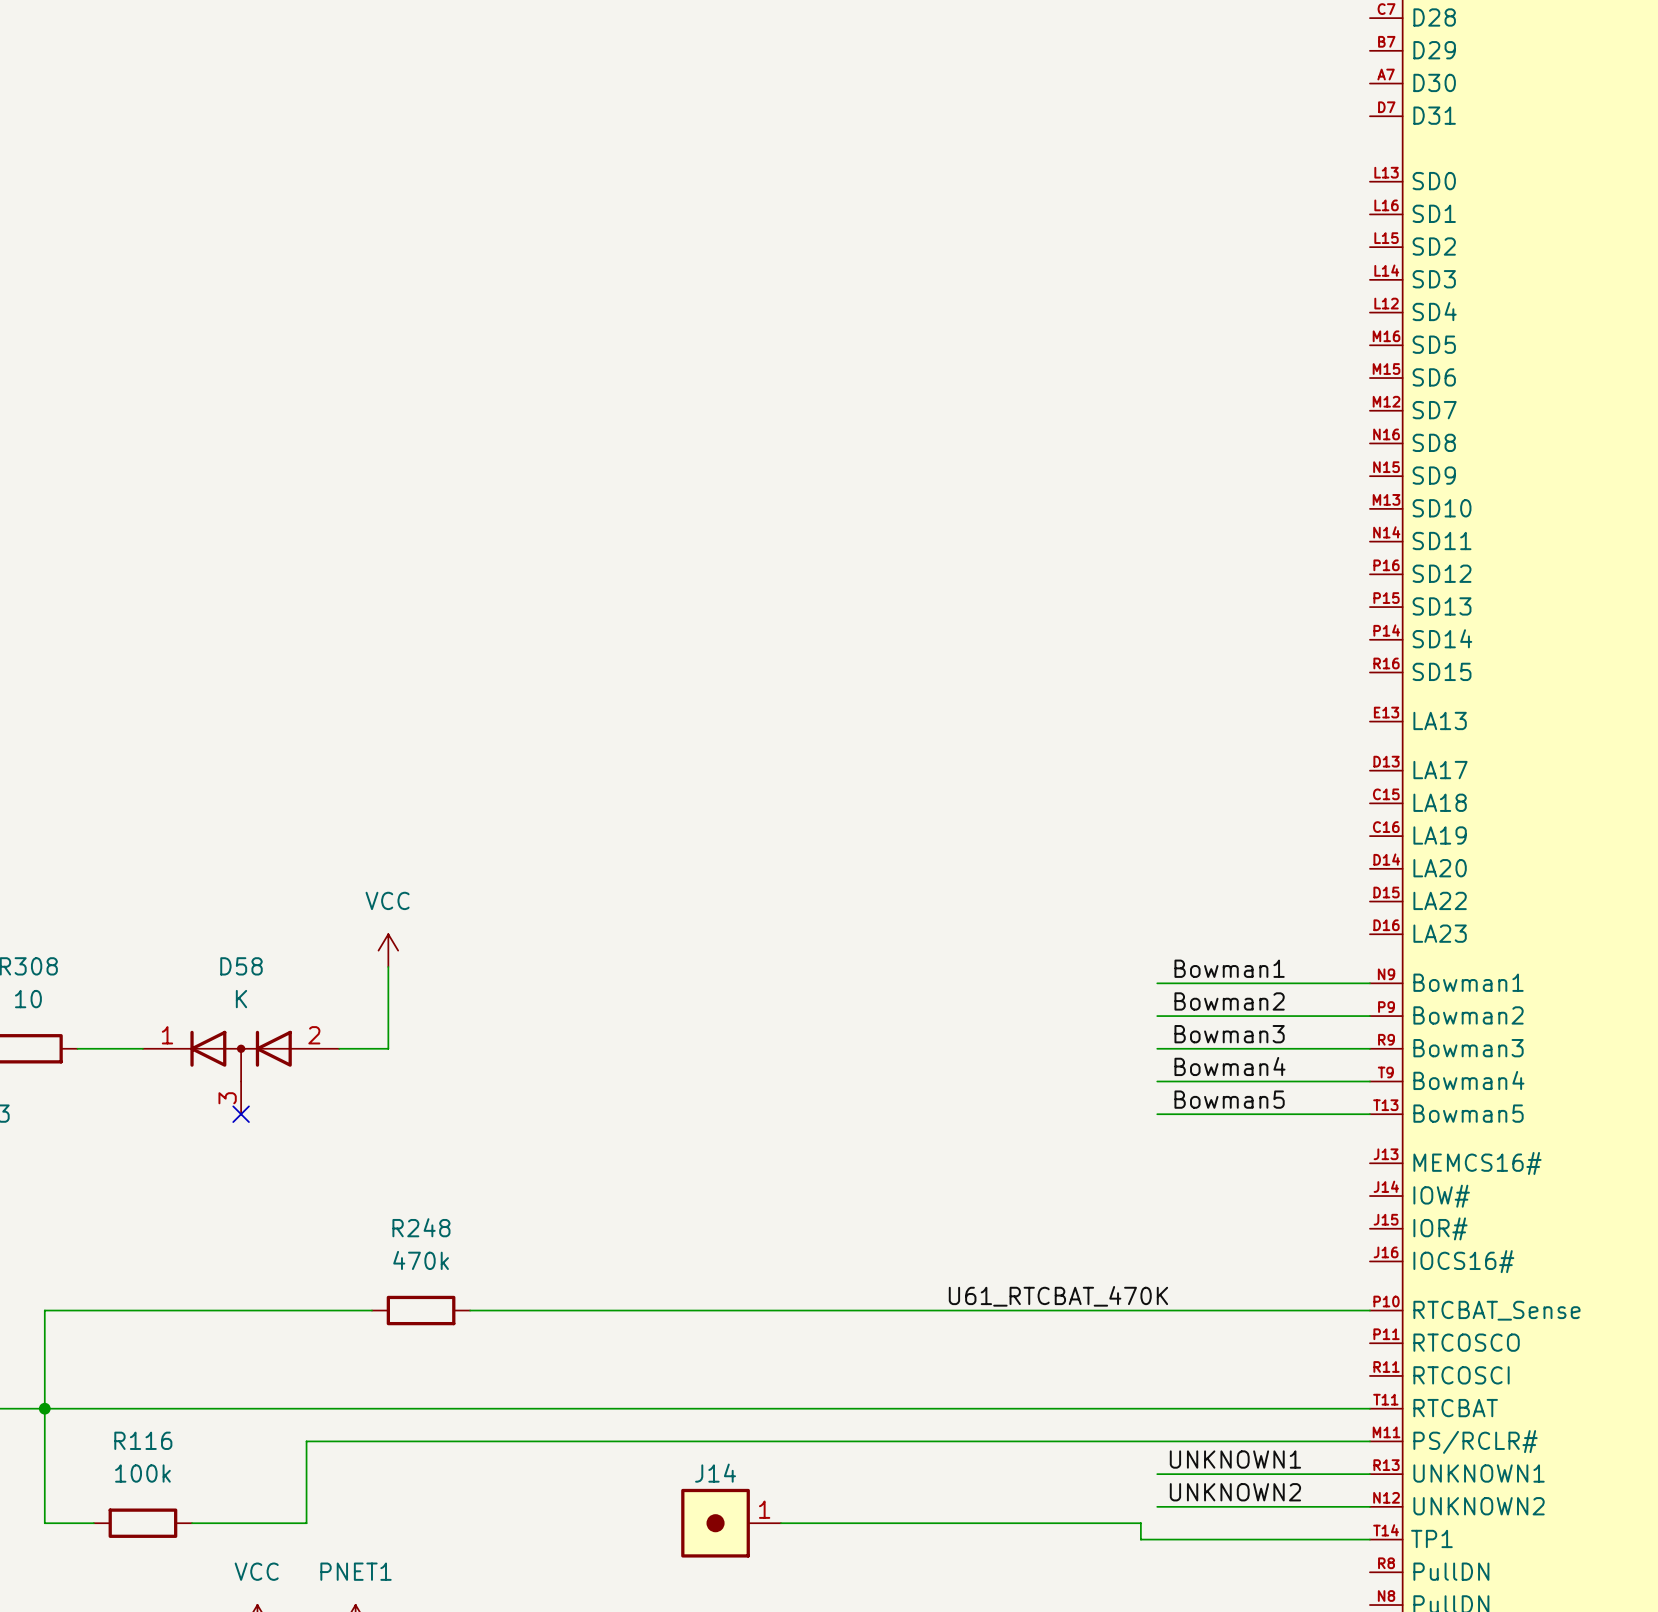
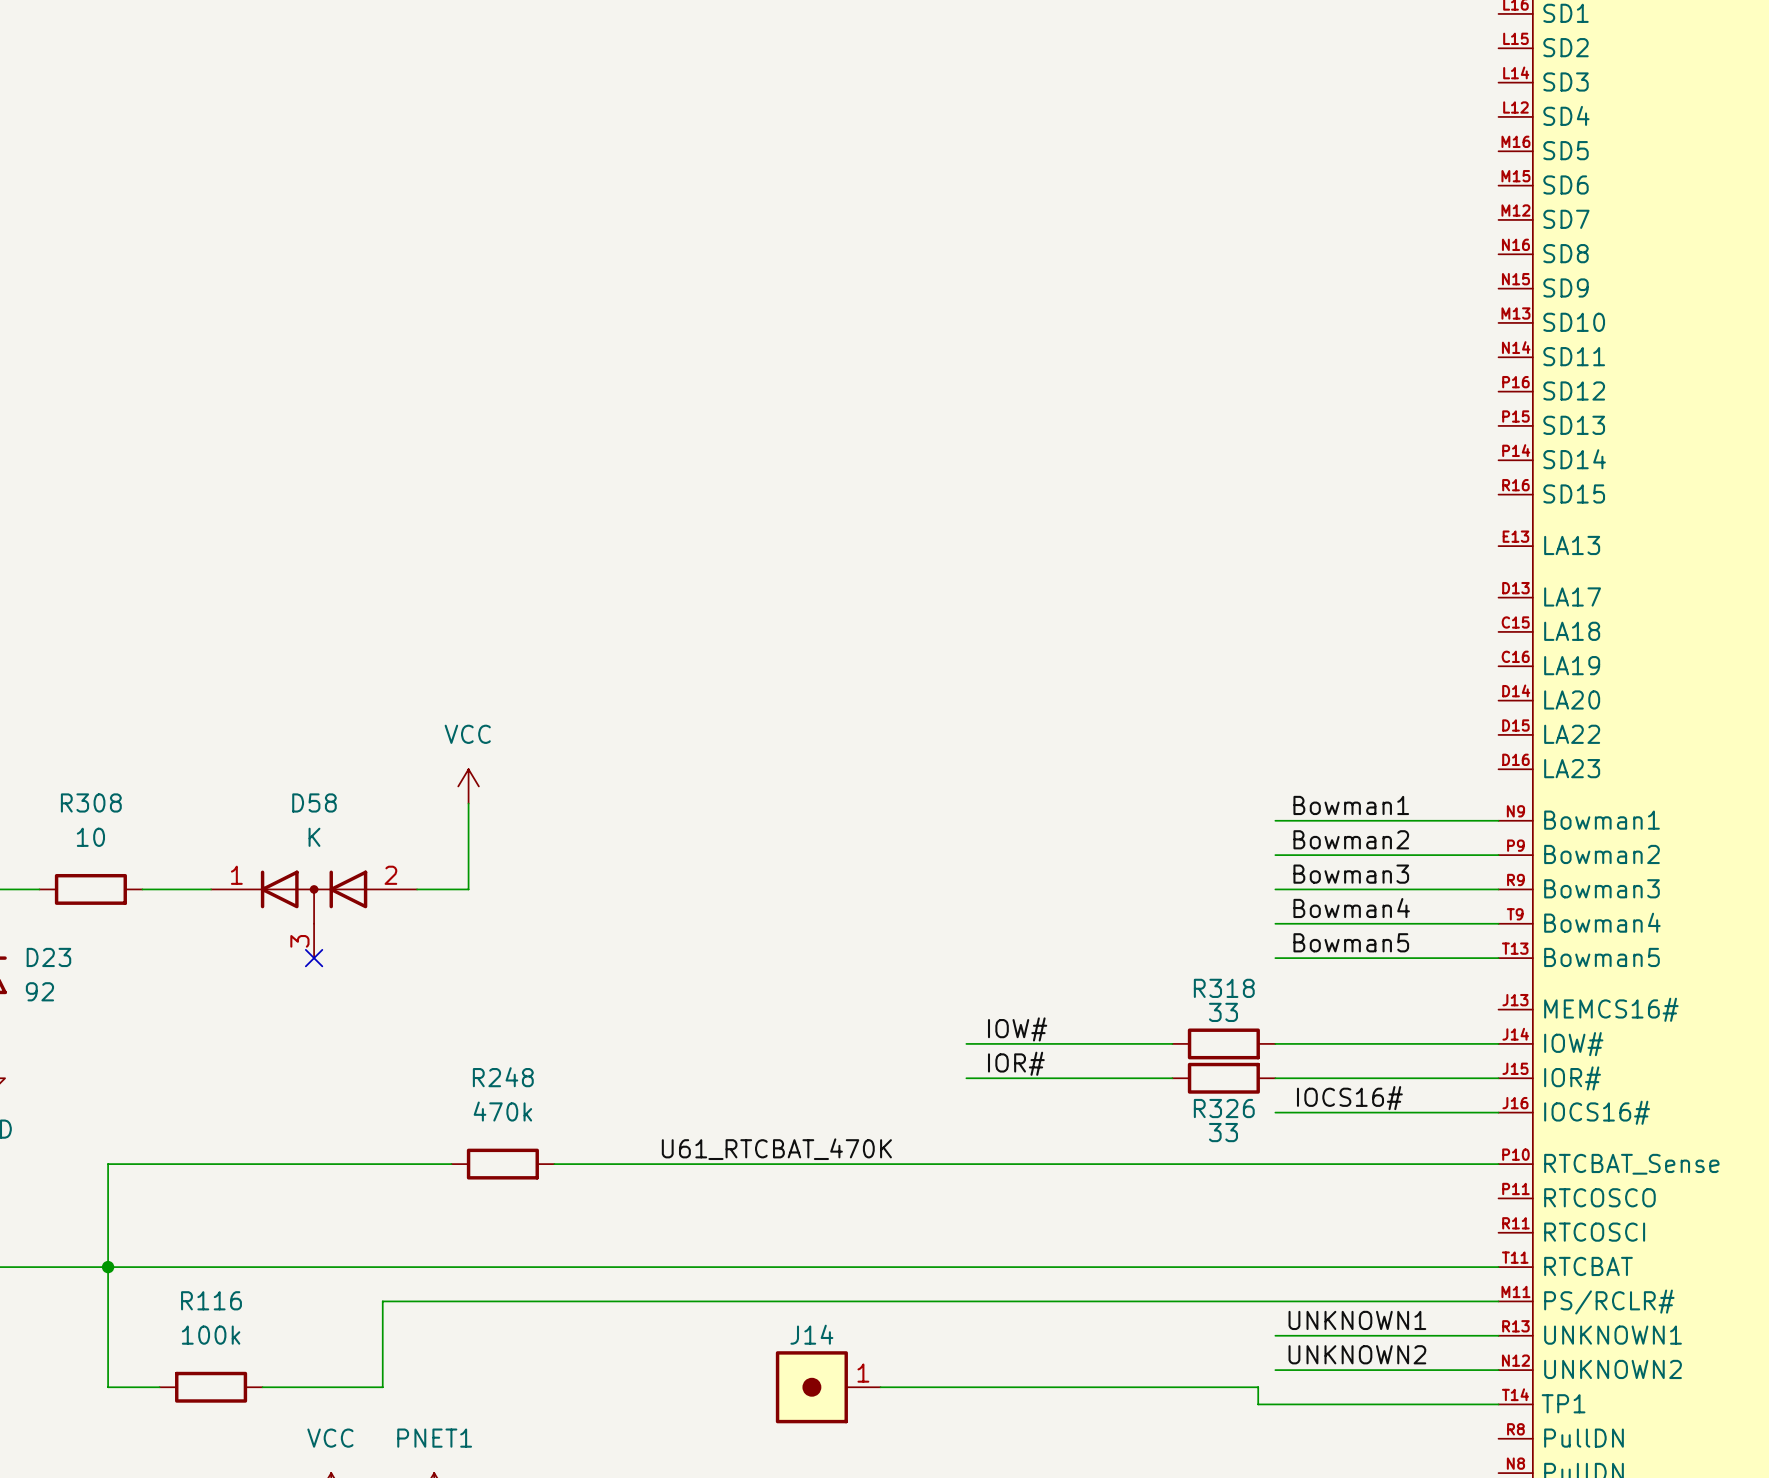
label: none -> IOW# (1017, 1029)
wire: none -> (966, 1043) (1172, 1043)
R318: none -> 33 (1223, 1043)
wire: none -> (1275, 1043) (1498, 1043)
label: none -> IOR# (1016, 1063)
wire: none -> (966, 1078) (1172, 1078)
R326: none -> 33 (1223, 1078)
wire: none -> (1275, 1078) (1498, 1078)
label: none -> IOCS16# (1349, 1098)
wire: none -> (1275, 1112) (1498, 1112)
label: none -> U61_RTCBAT_470K (776, 1149)
label: U61_RTCBAT_470K (1058, 1296) -> none

